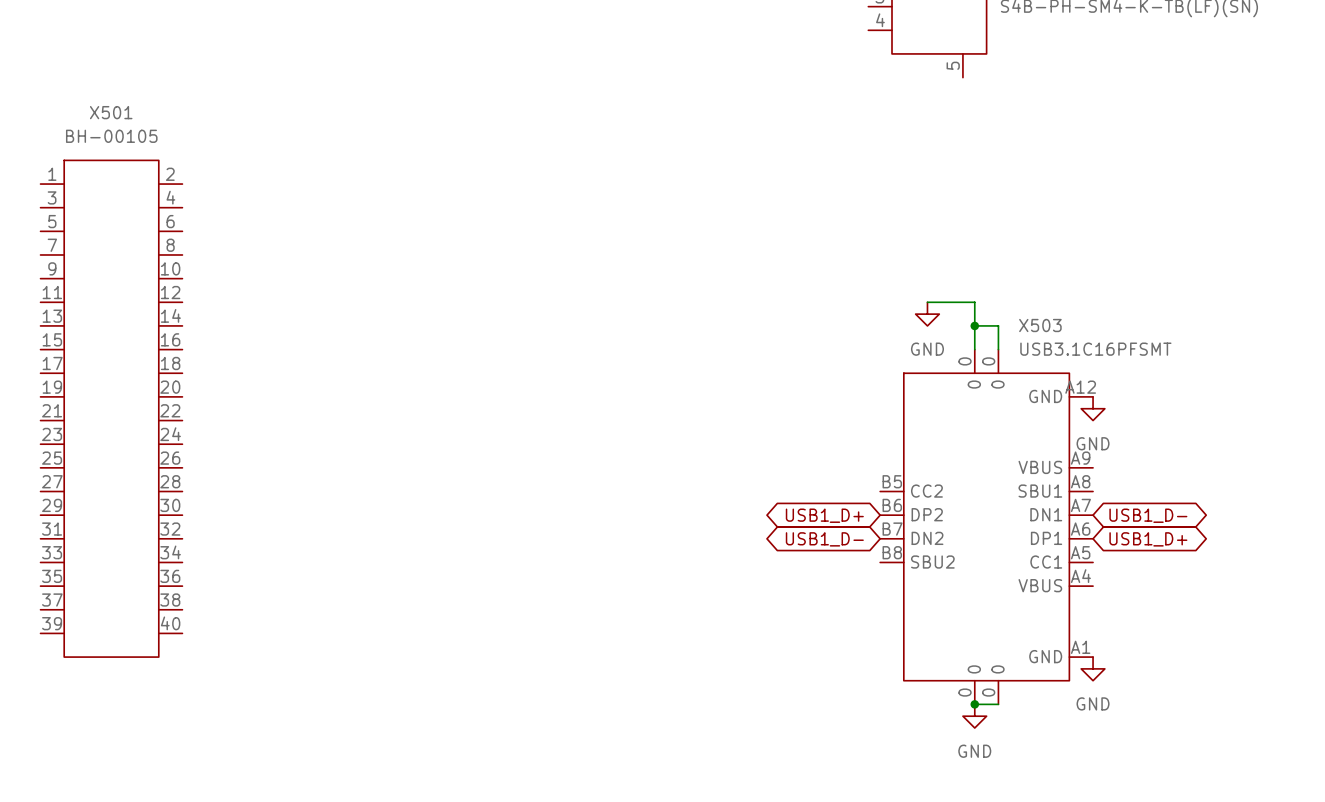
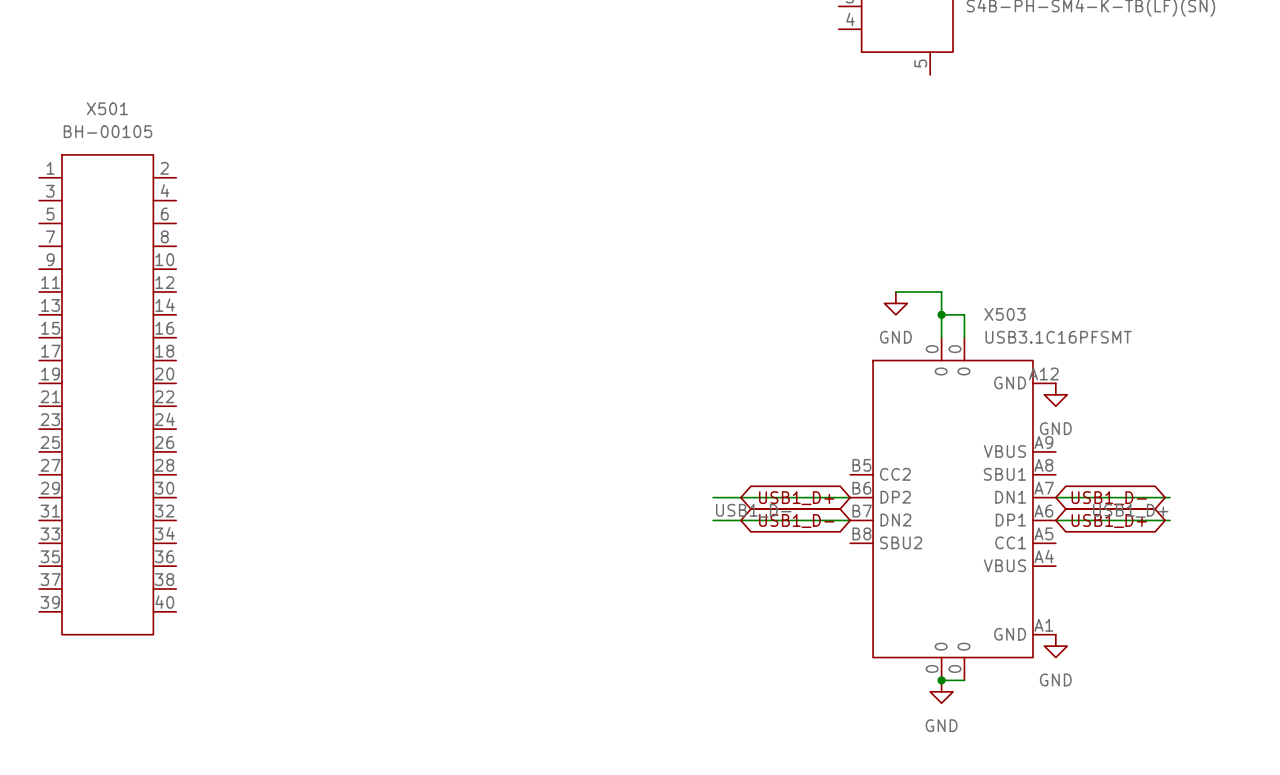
wire: none -> (713, 497) (850, 497)
wire: none -> (1055, 497) (1170, 497)
label: none -> USB1_D- (753, 510)
label: none -> USB1_D+ (1130, 510)
wire: none -> (713, 520) (850, 520)
wire: none -> (1055, 520) (1170, 520)

